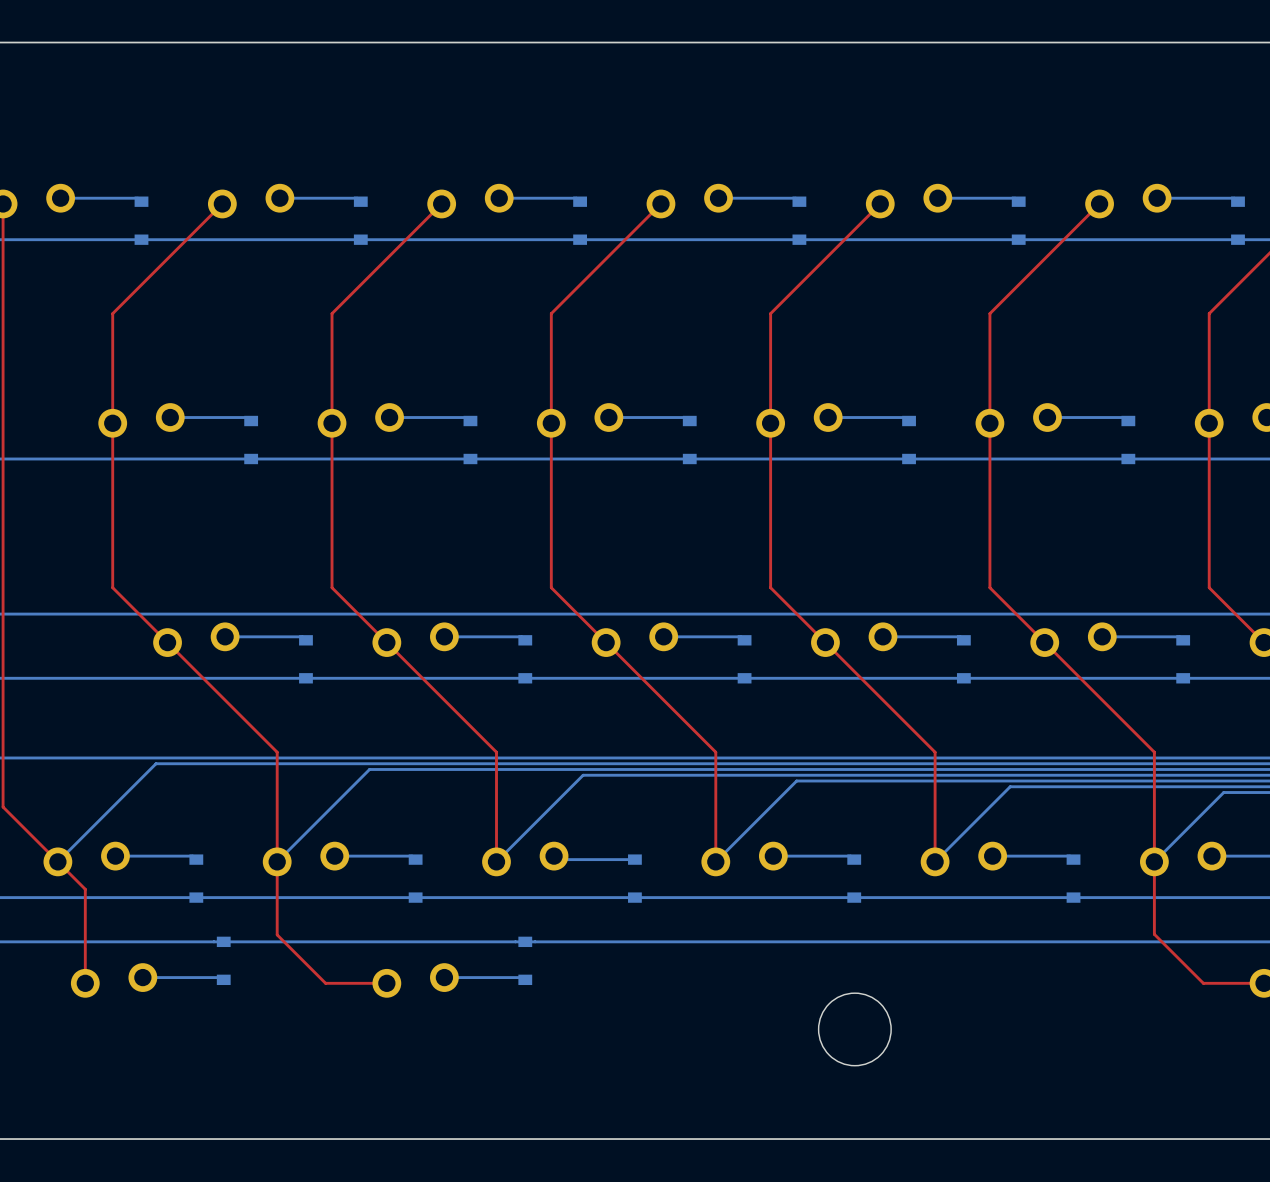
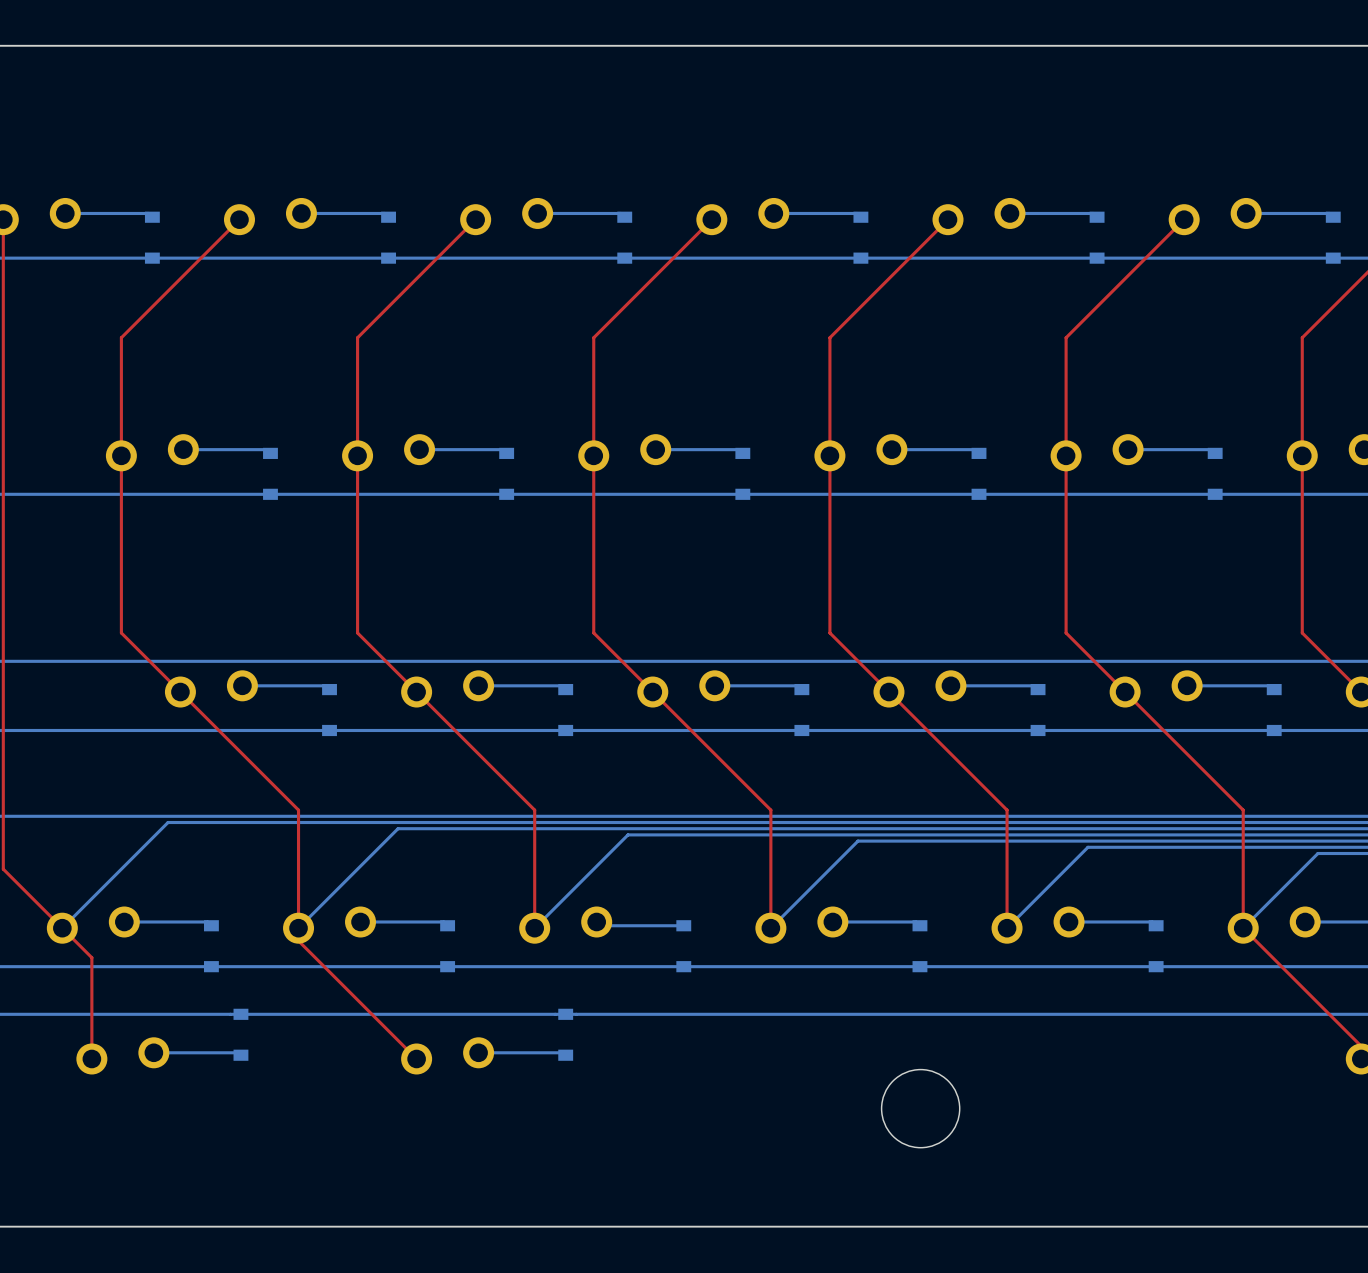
top track: (1154, 861) (1154, 934) (1203, 983) (1264, 983) -> (1243, 928) (1361, 1046) (1361, 1058)
top track: (277, 873) (277, 934) (325, 983) (386, 983) -> (298, 940) (416, 1058)

